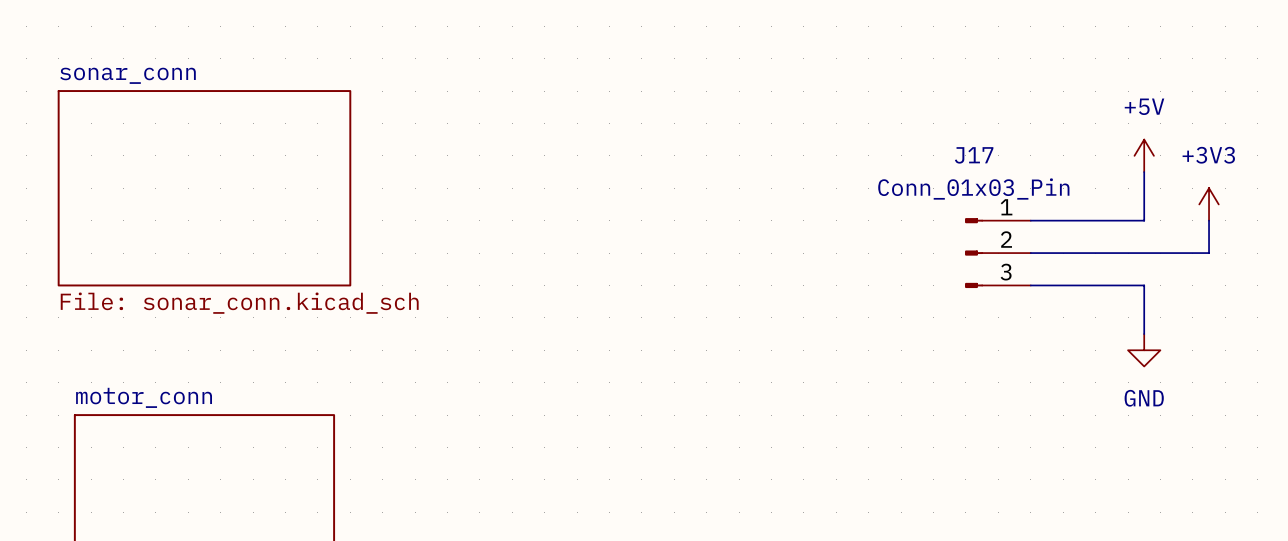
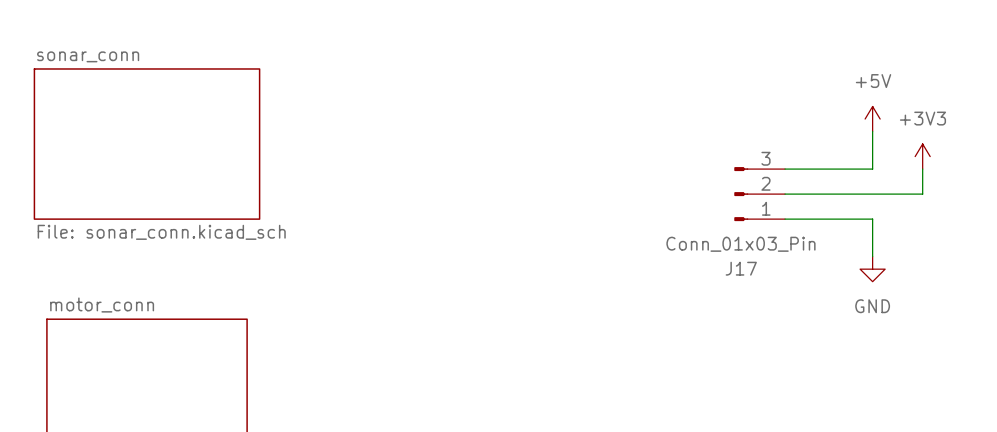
J17 flip: as is (974, 253) -> up-down (741, 194)

